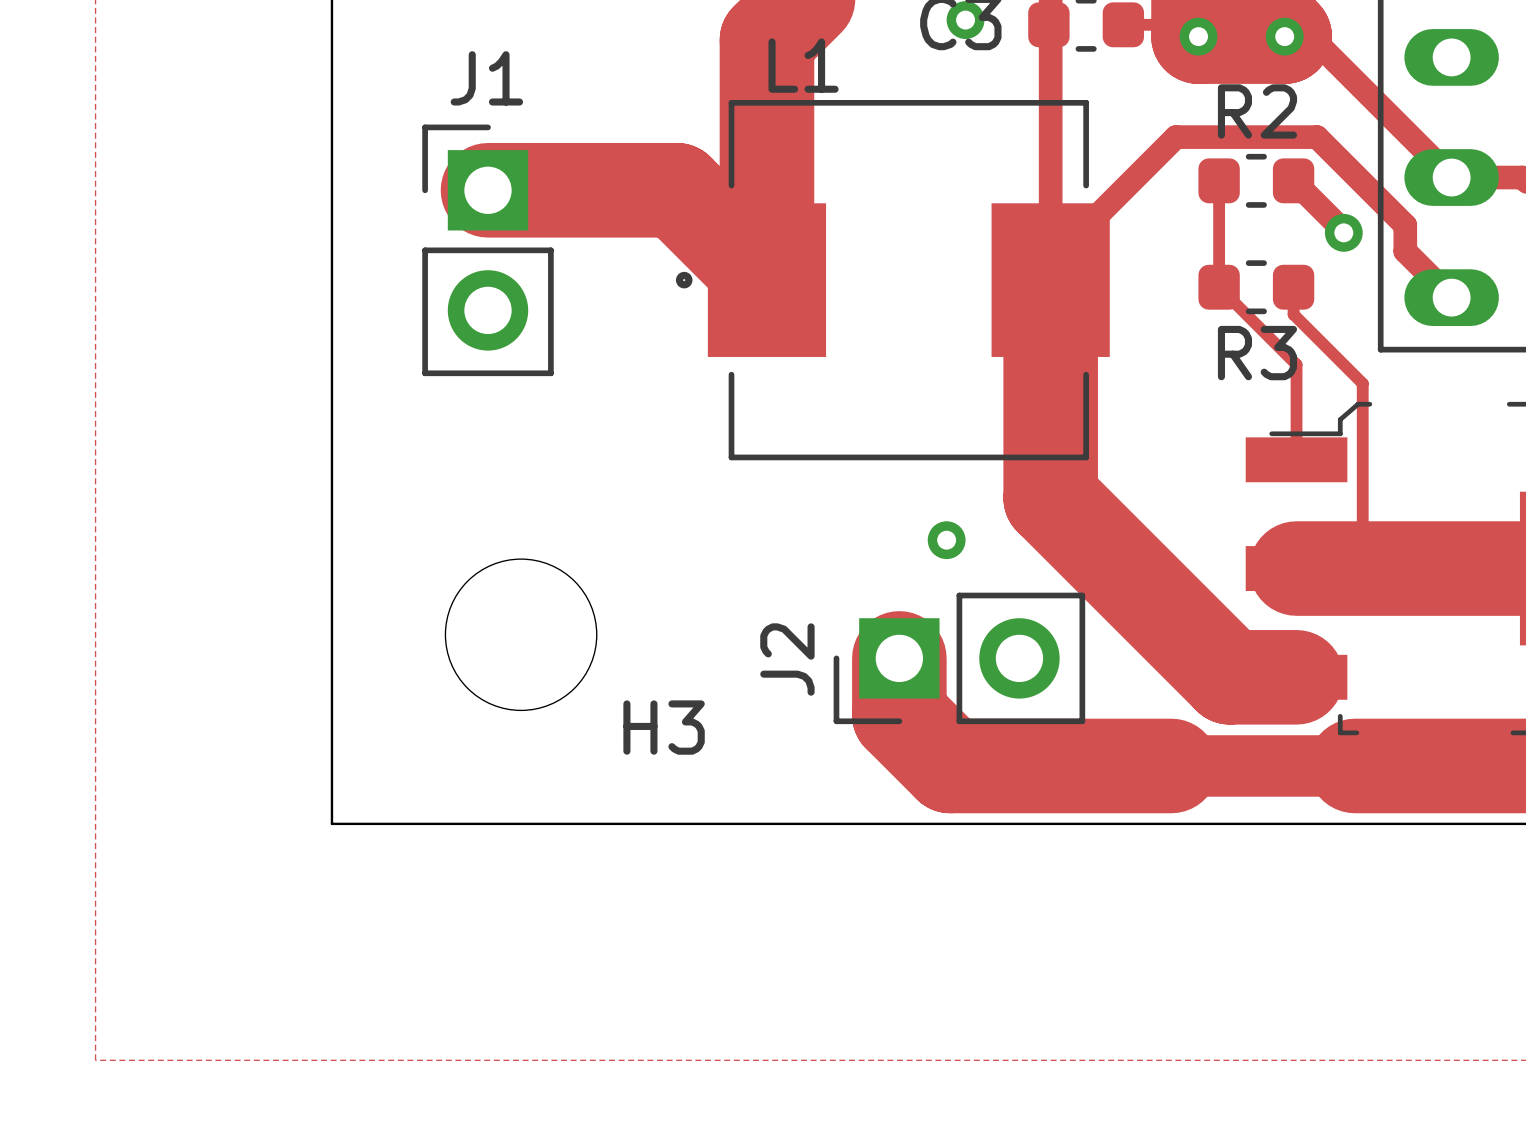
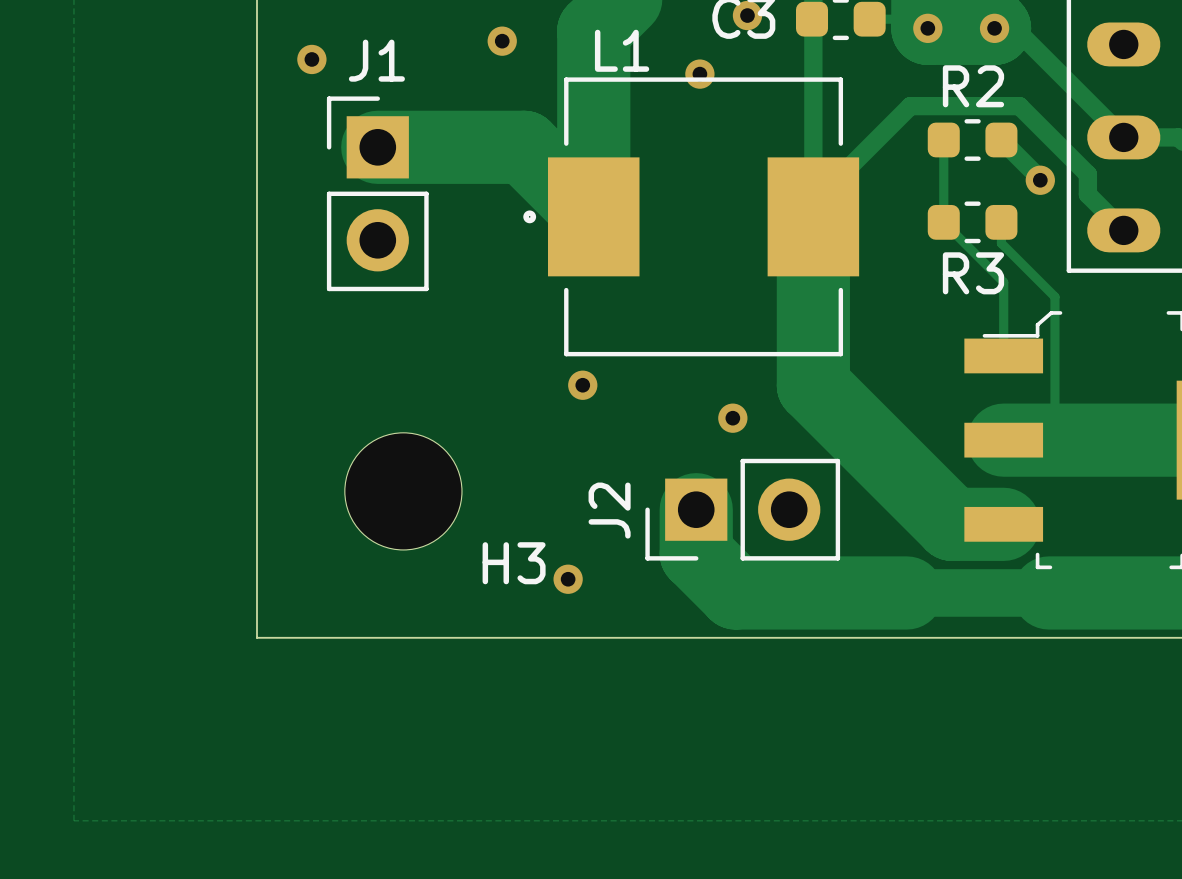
via: none -> (502, 41)
via: none -> (311, 59)
via: none -> (699, 74)
via: none -> (582, 385)
via: none -> (568, 579)

